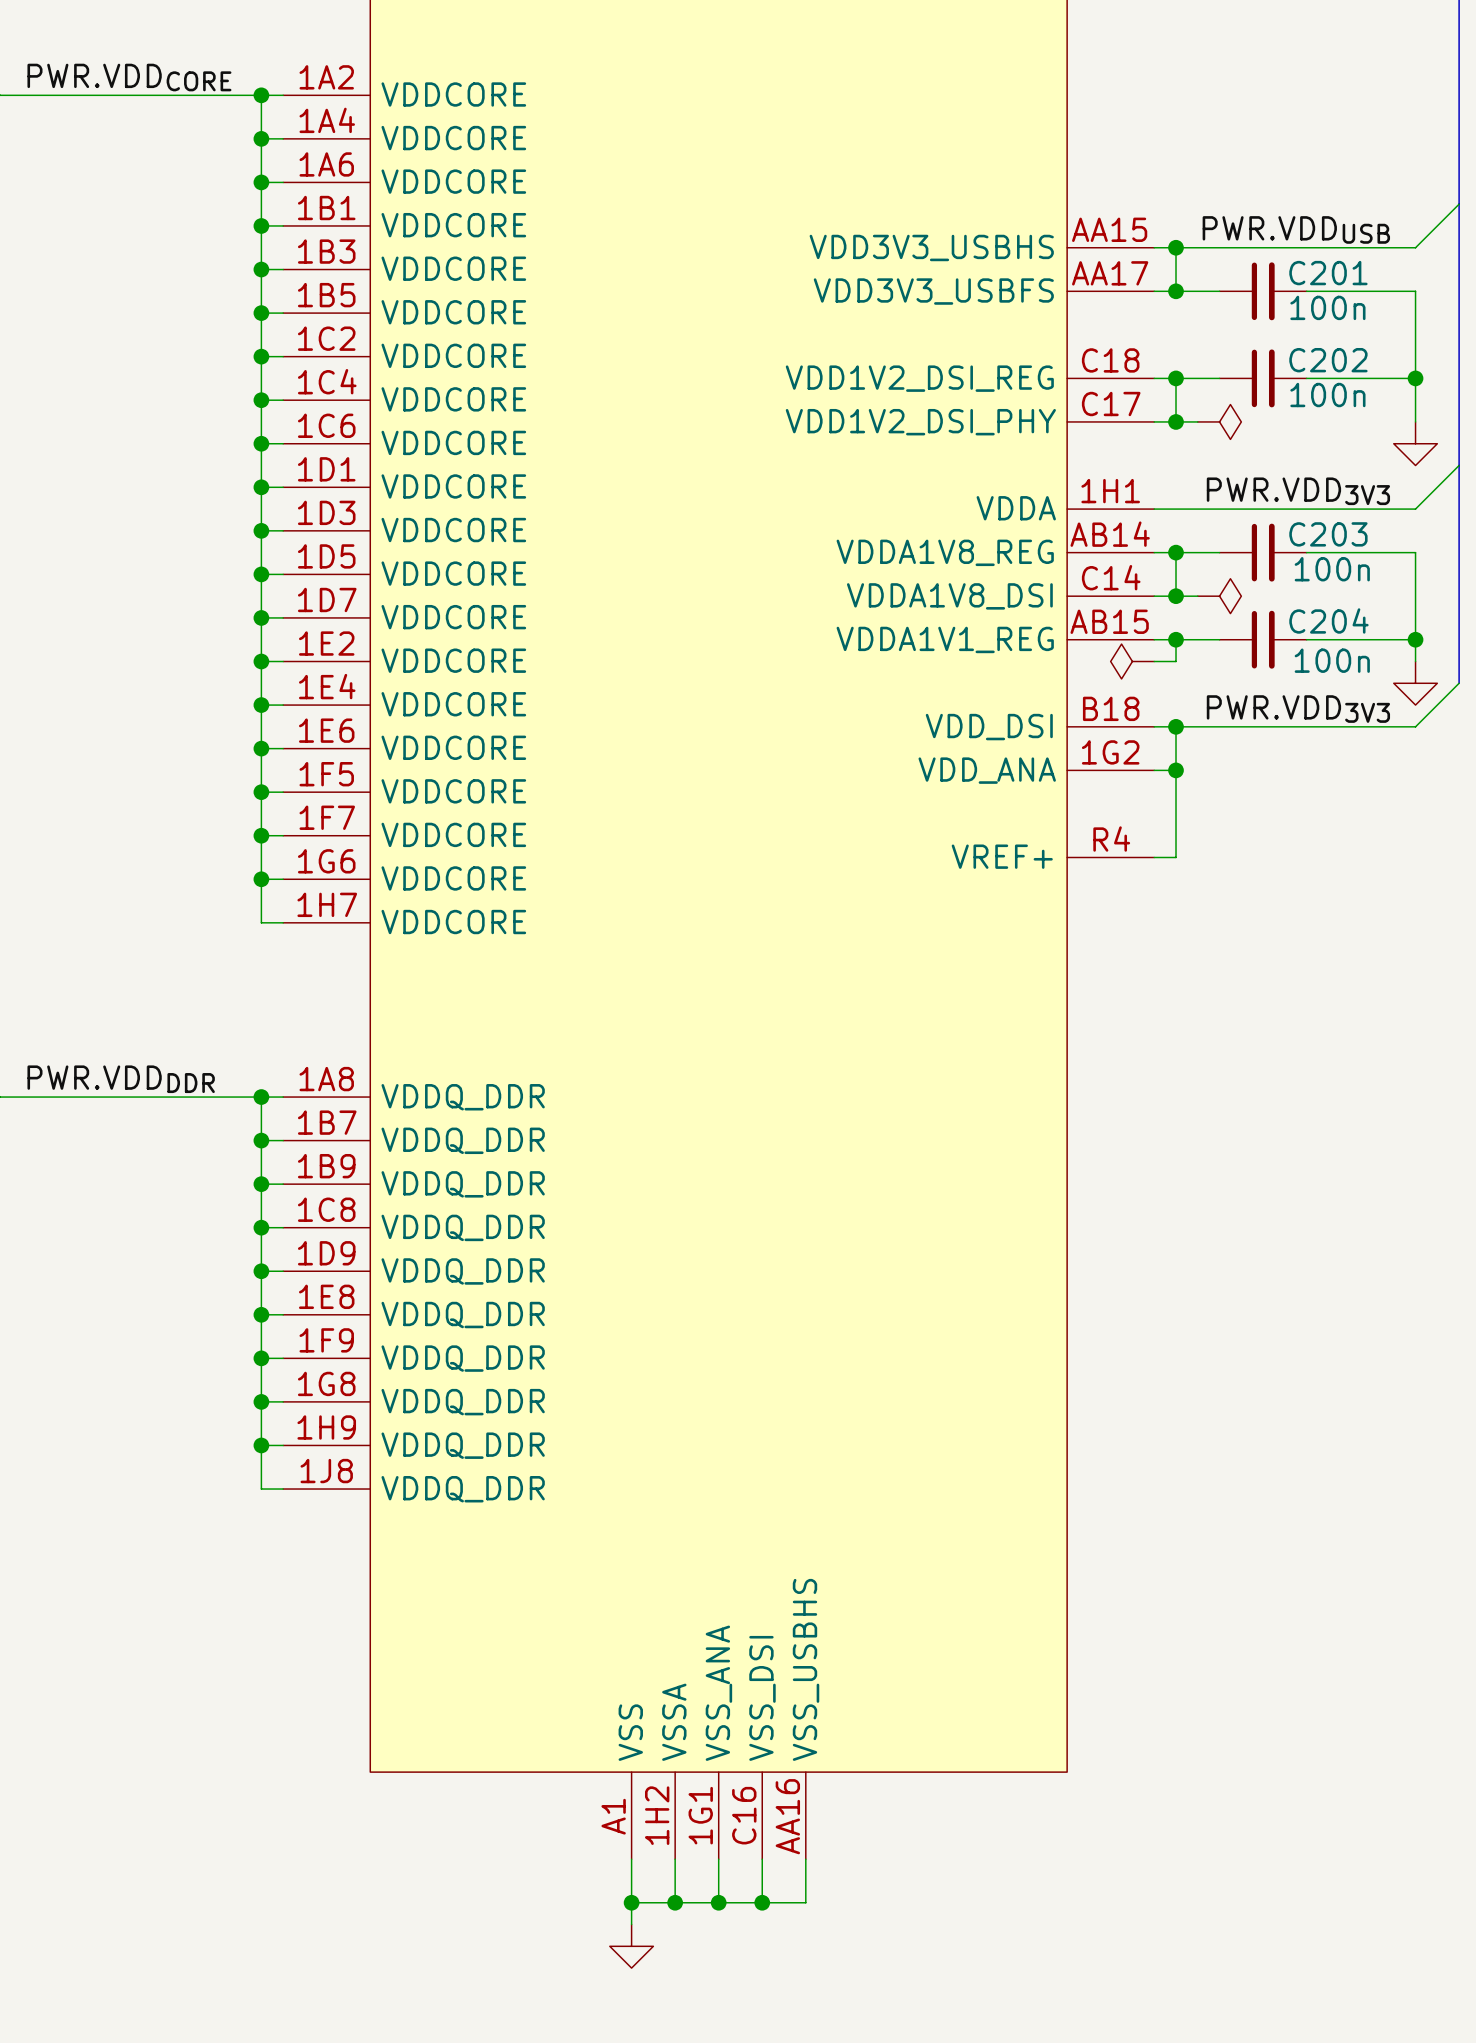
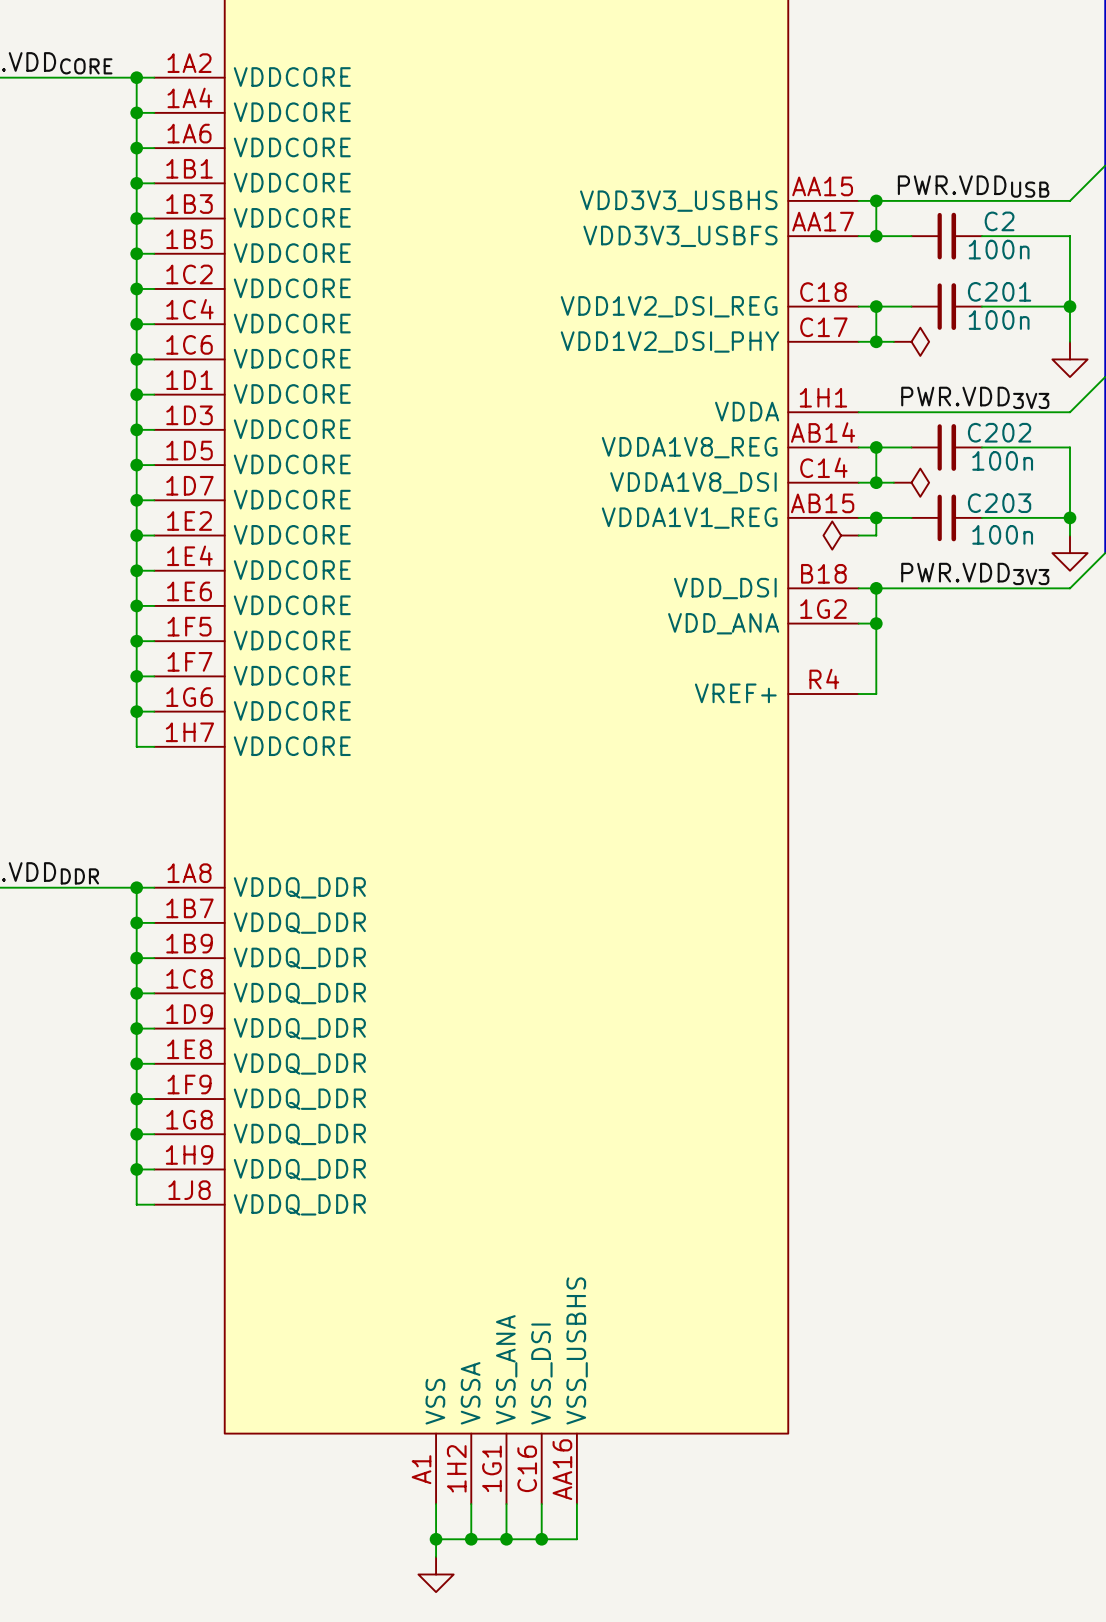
C201 name: C201 (1328, 273) -> C2 (999, 221)
C202 name: C202 (1328, 360) -> C201 (999, 291)
C203 name: C203 (1328, 534) -> C202 (999, 432)
C204 name: C204 (1328, 620) -> C203 (999, 503)

